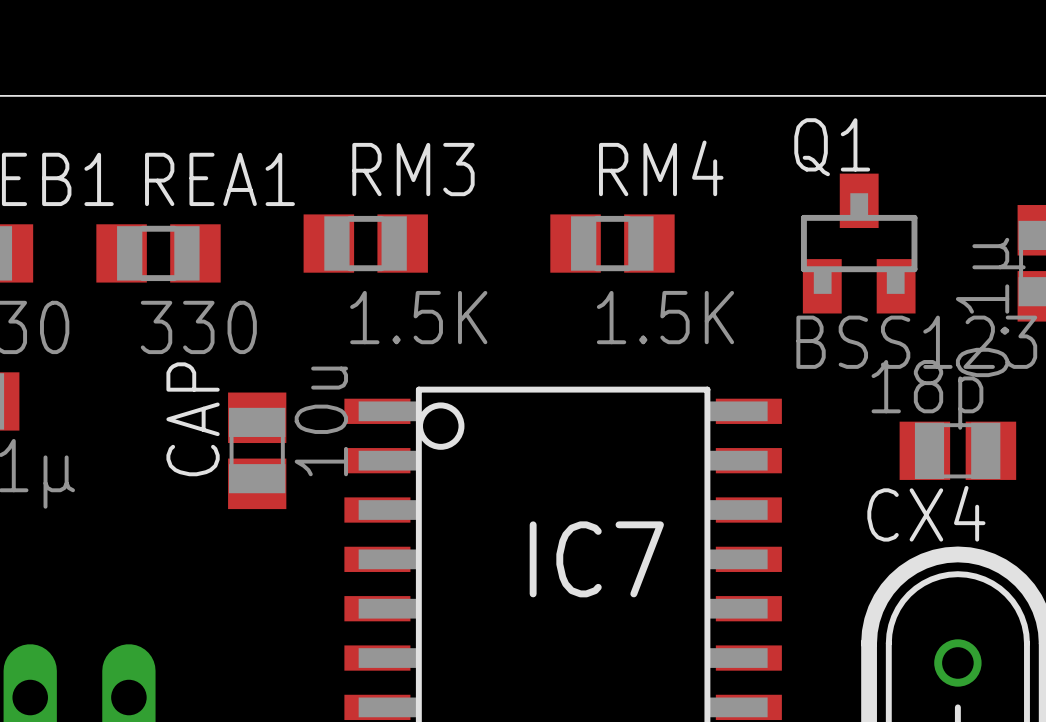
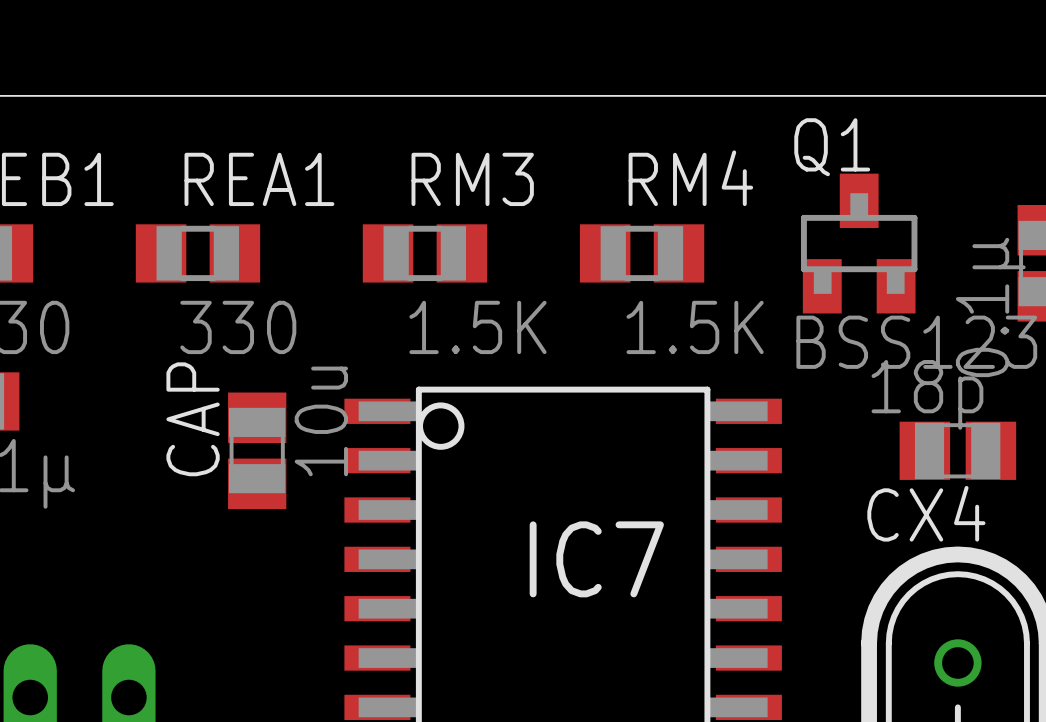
RM3 position: (365, 243) -> (424, 253)
RM4 position: (612, 243) -> (642, 253)
REA1 position: (158, 253) -> (197, 253)

